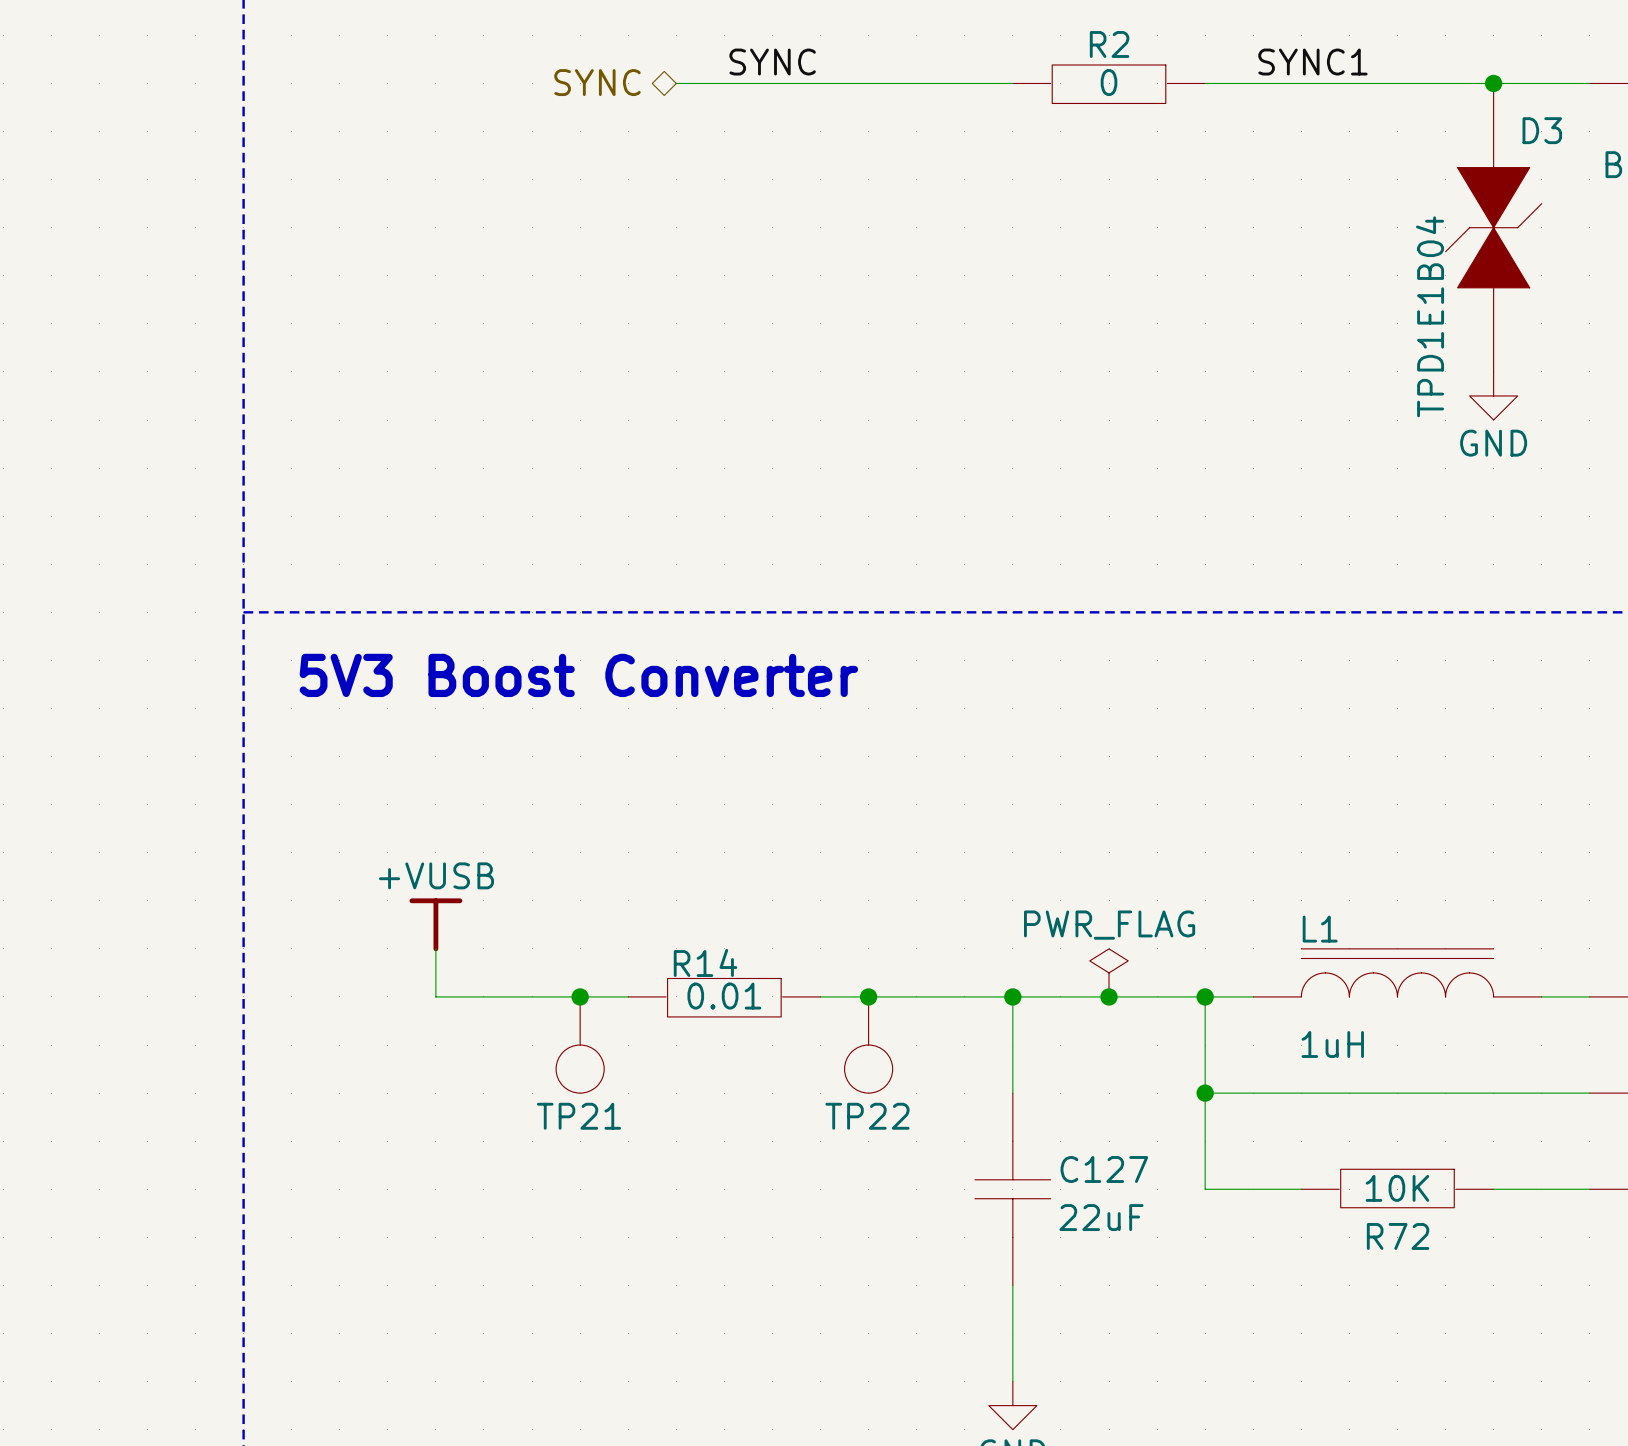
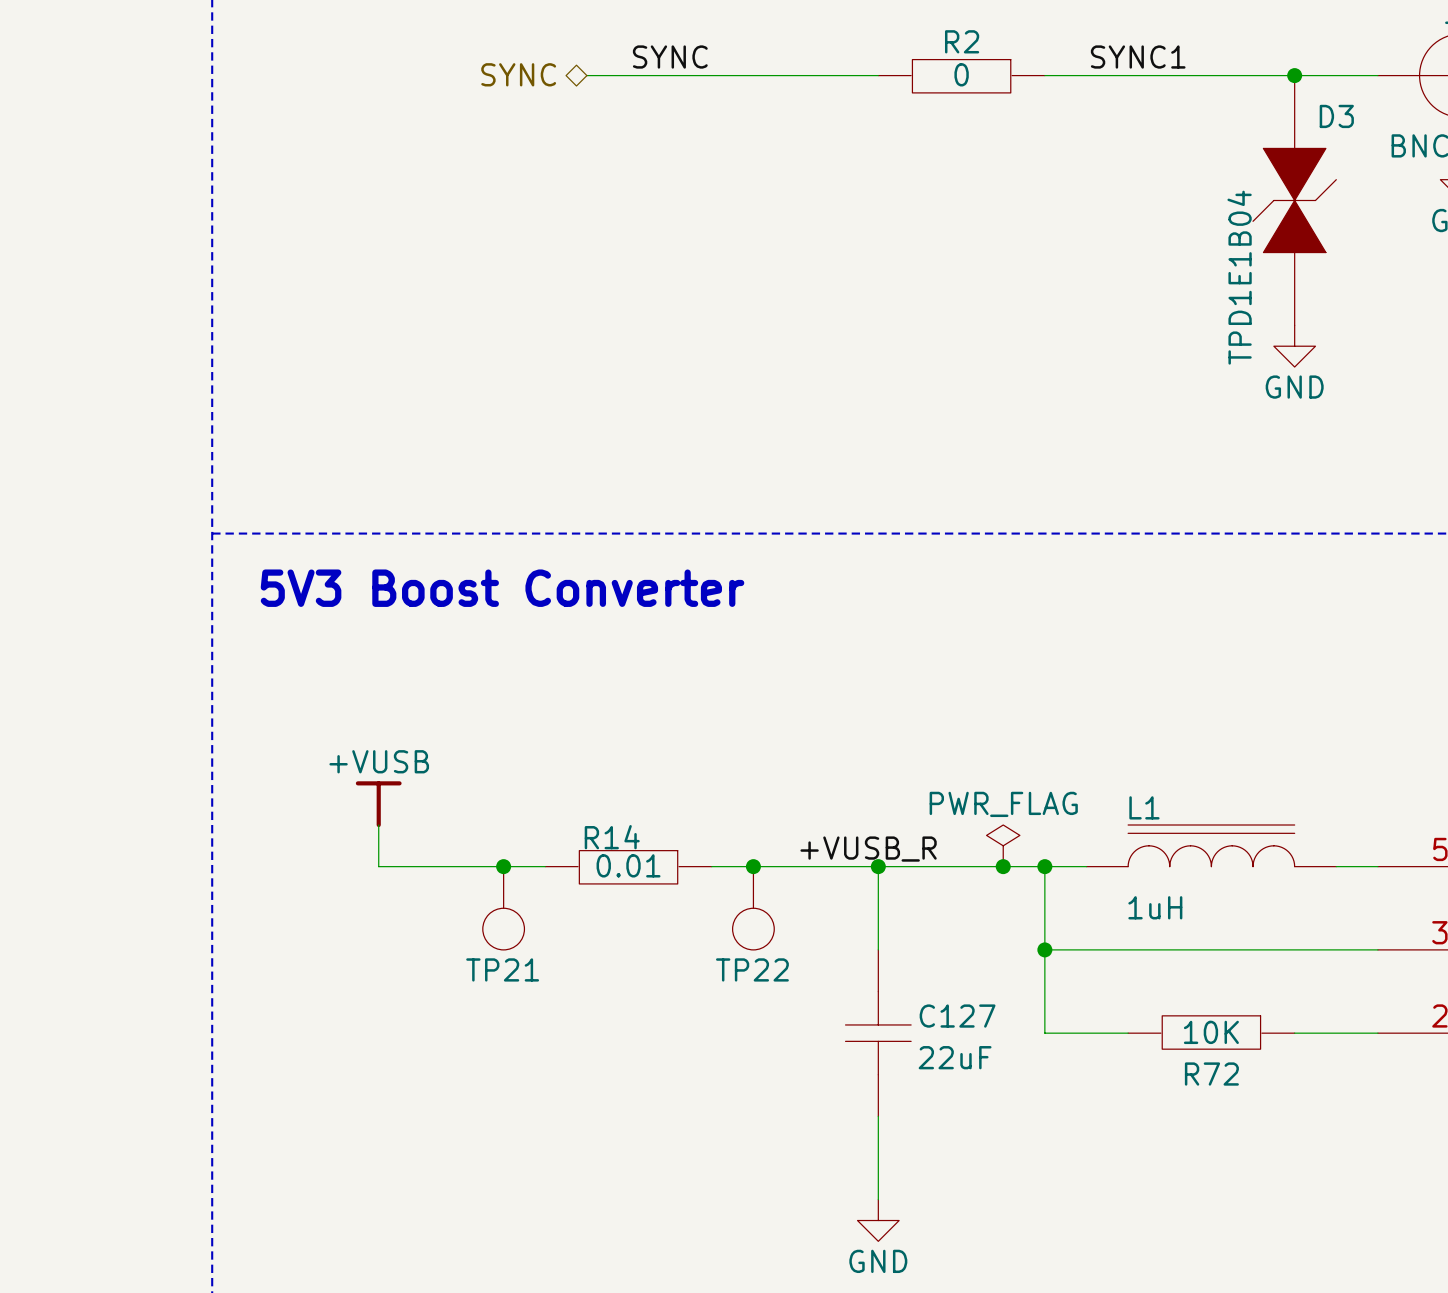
power symbol position: PWR_FLAG (1109, 972) -> PWR_FLAG (1003, 845)
label: none -> +VUSB_R (868, 849)
junction position: (1109, 996) -> (1003, 866)

